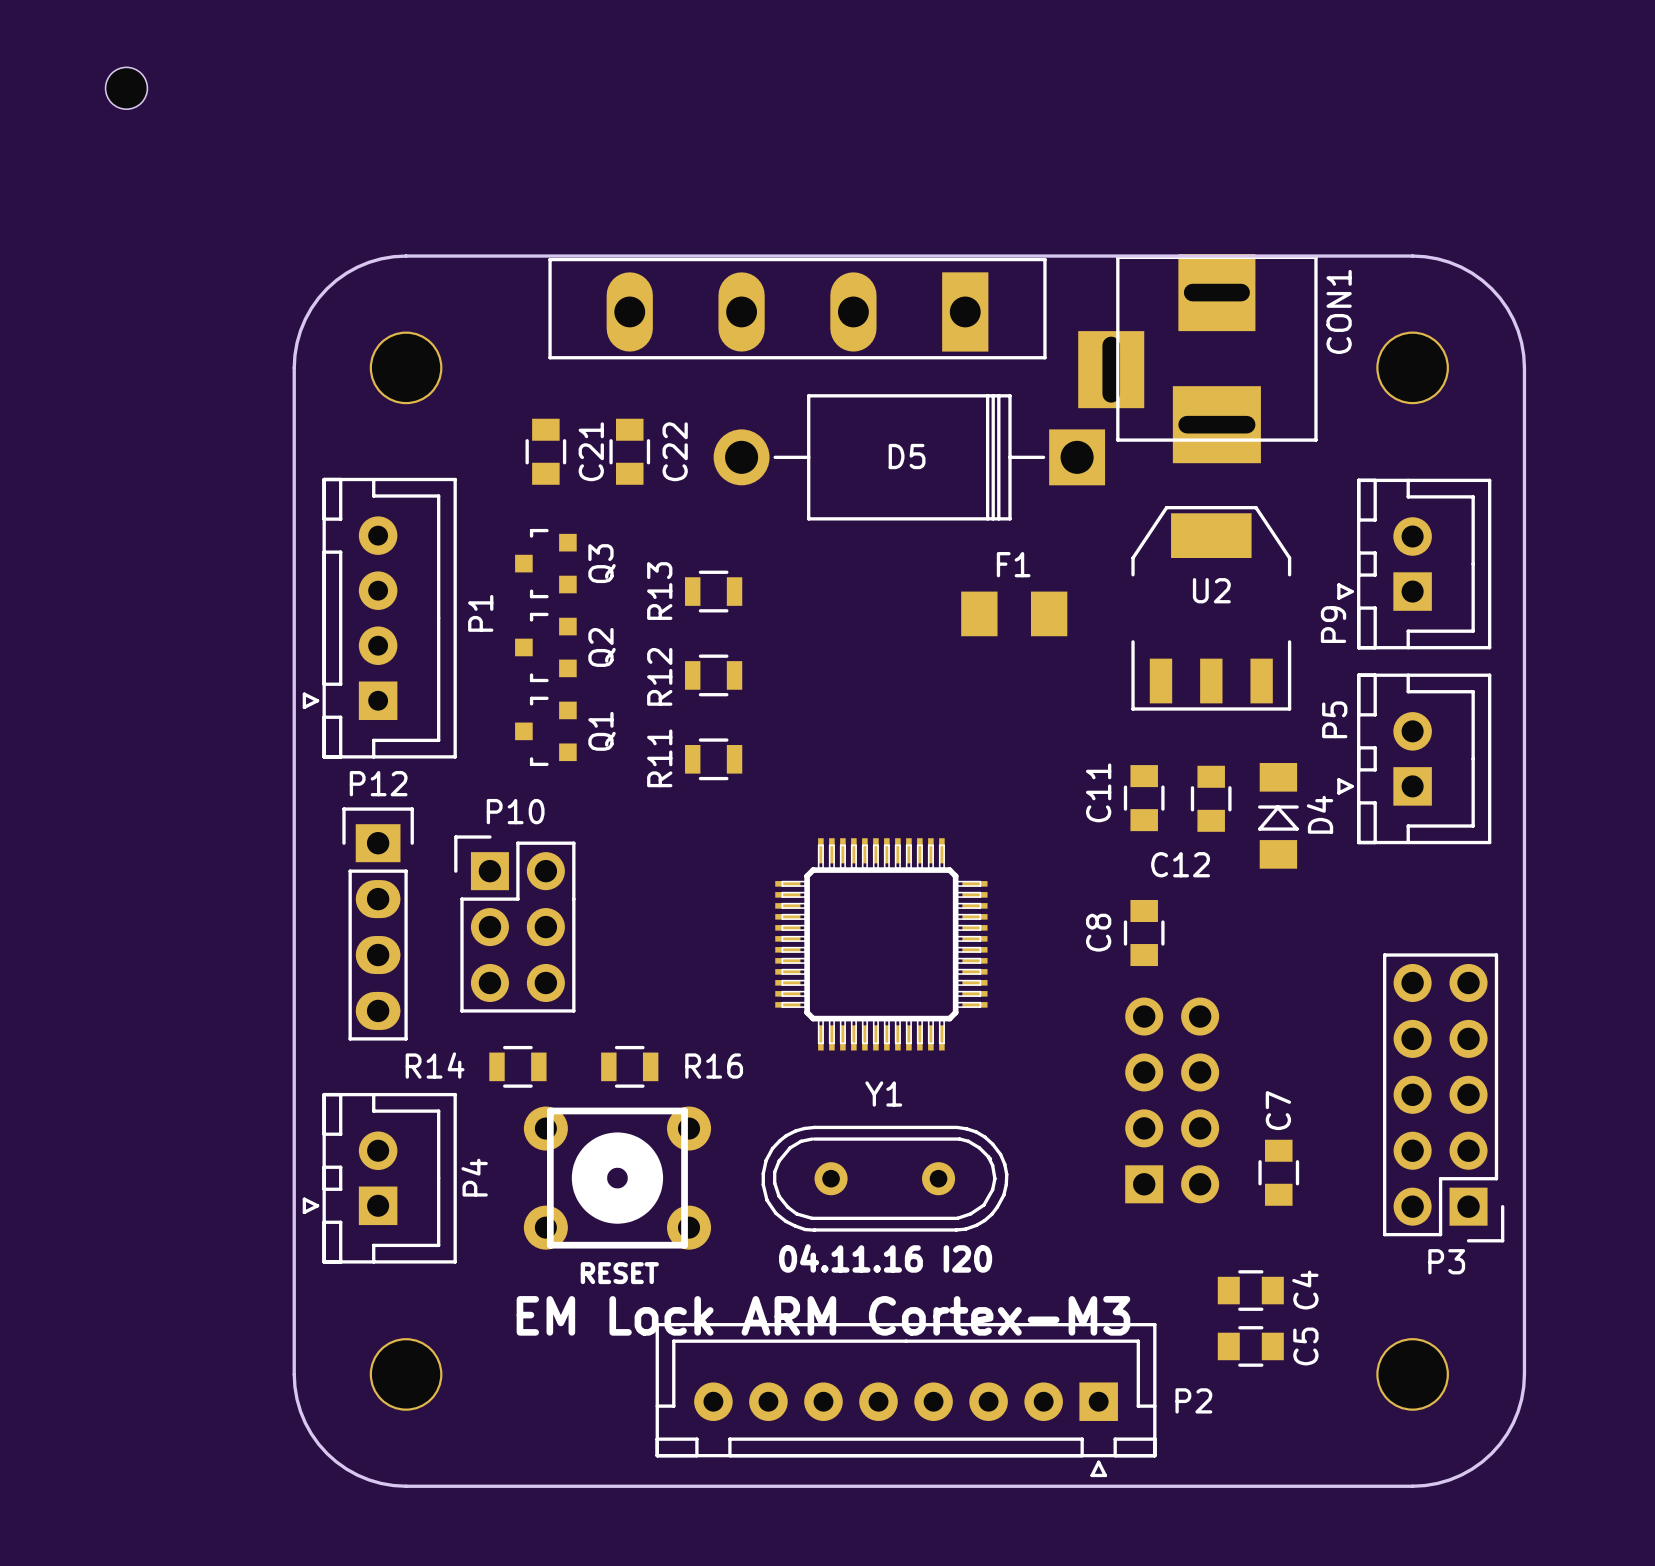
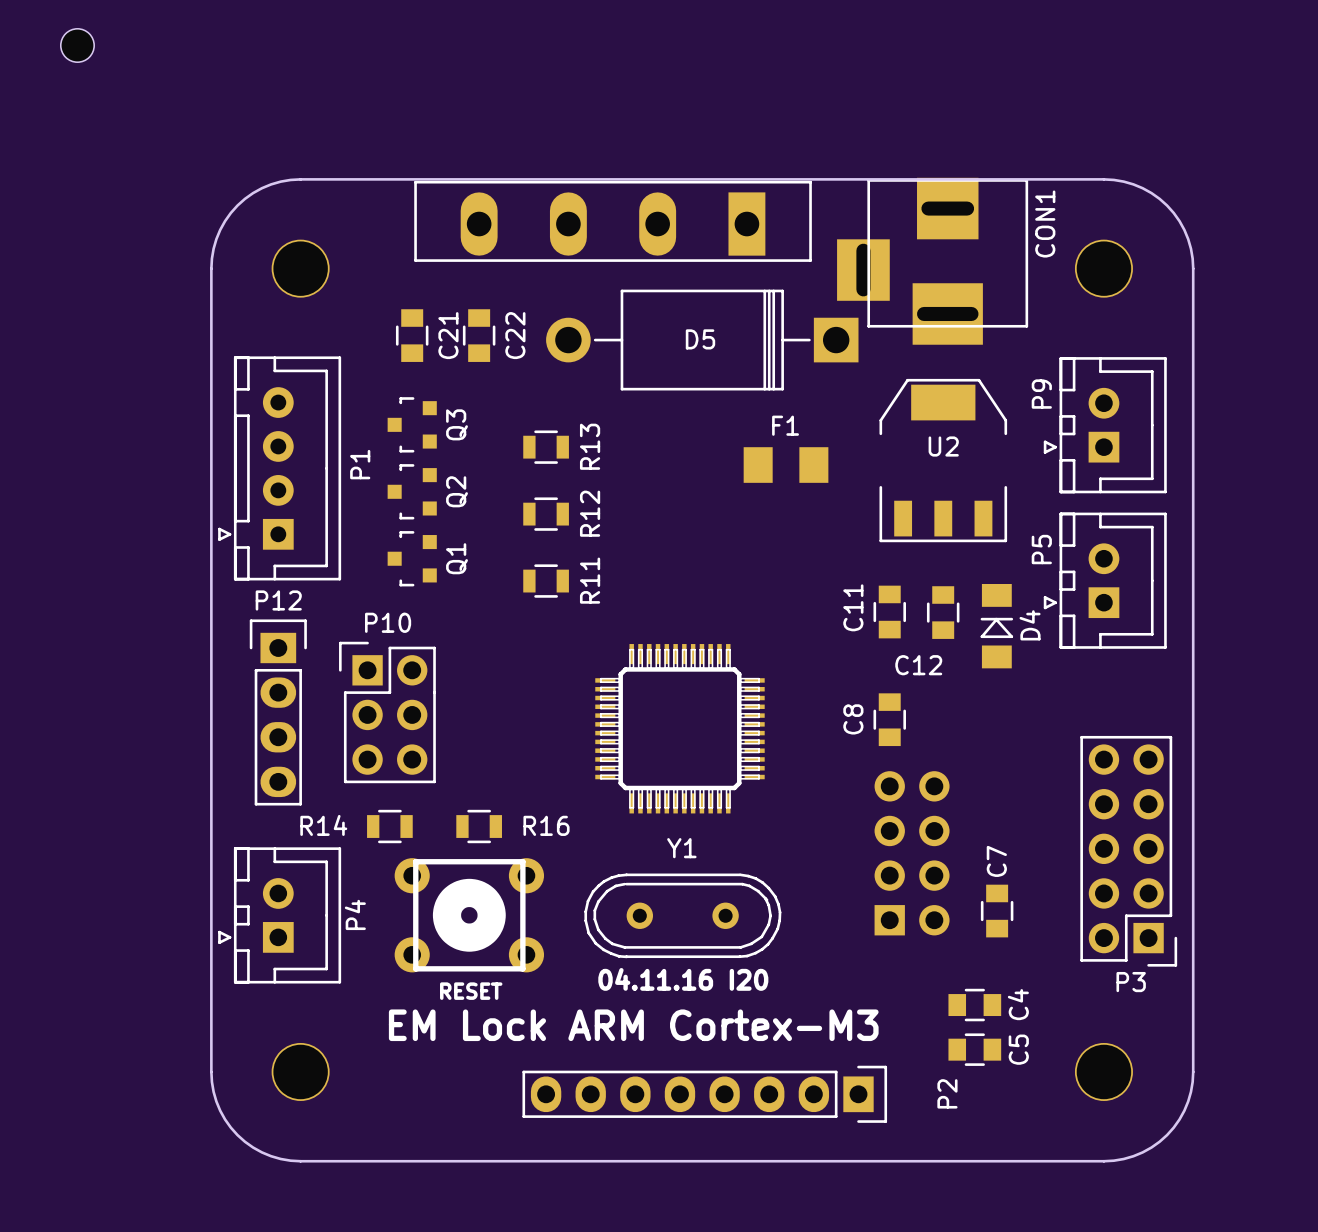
R13 name position: R13 (659, 591) -> R13 (590, 446)
P9 name position: P9 (1333, 624) -> P9 (1041, 394)
R12 name position: R12 (659, 676) -> R12 (590, 513)
R11 name position: R11 (659, 758) -> R11 (590, 580)
P2 footprint: [655, 1323, 1157, 1478] -> [522, 1065, 888, 1123]

